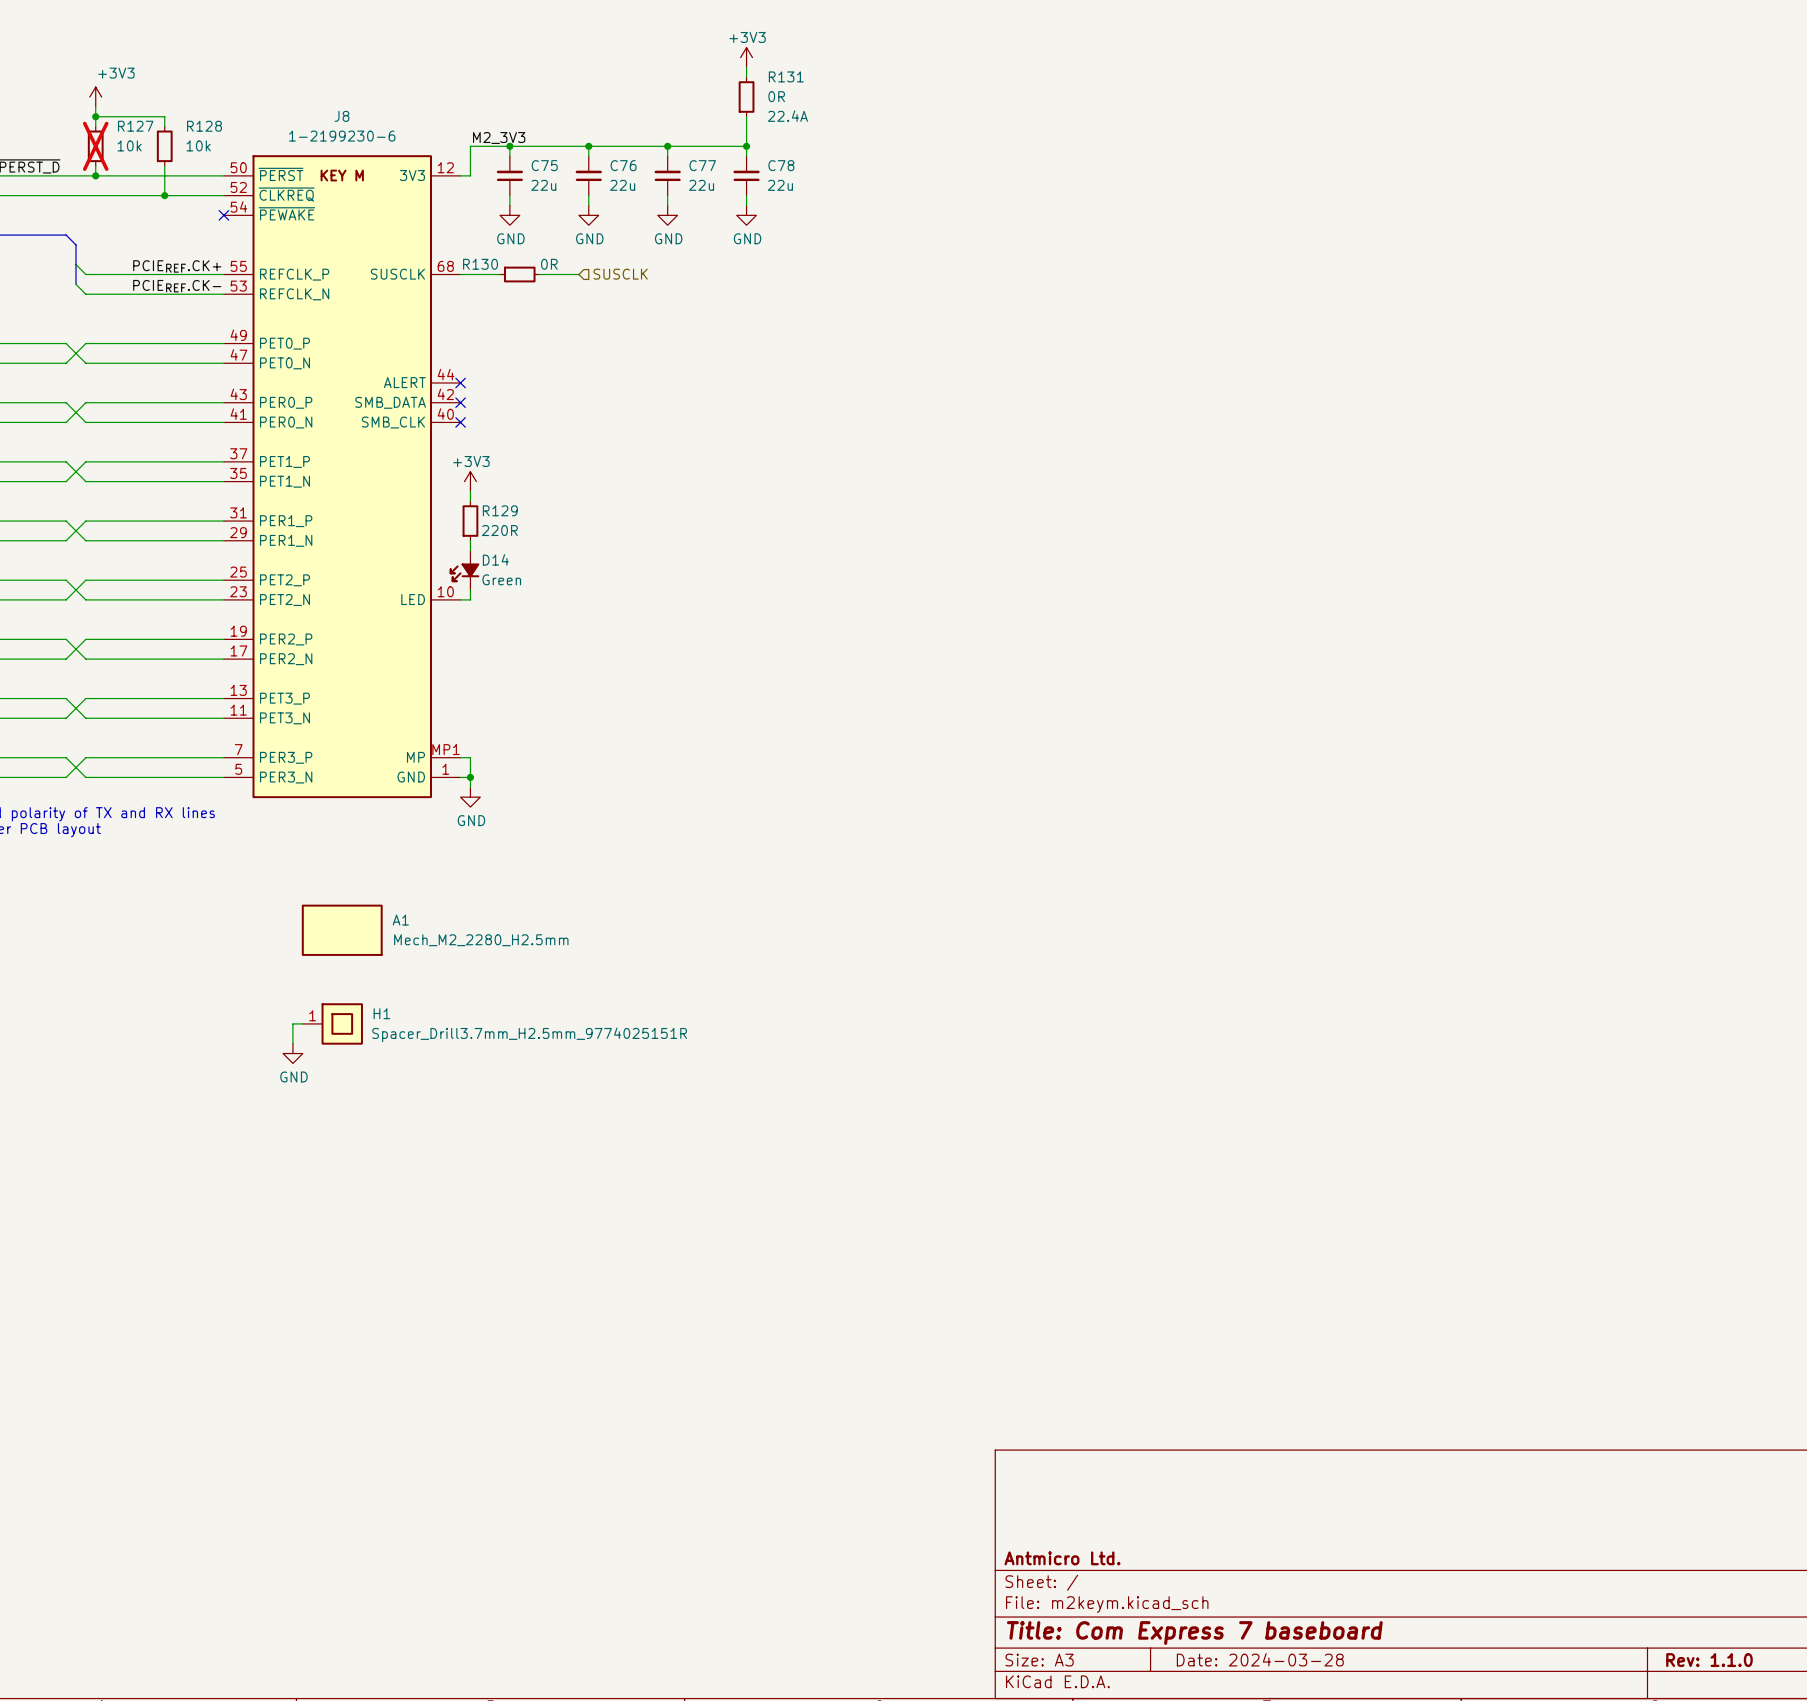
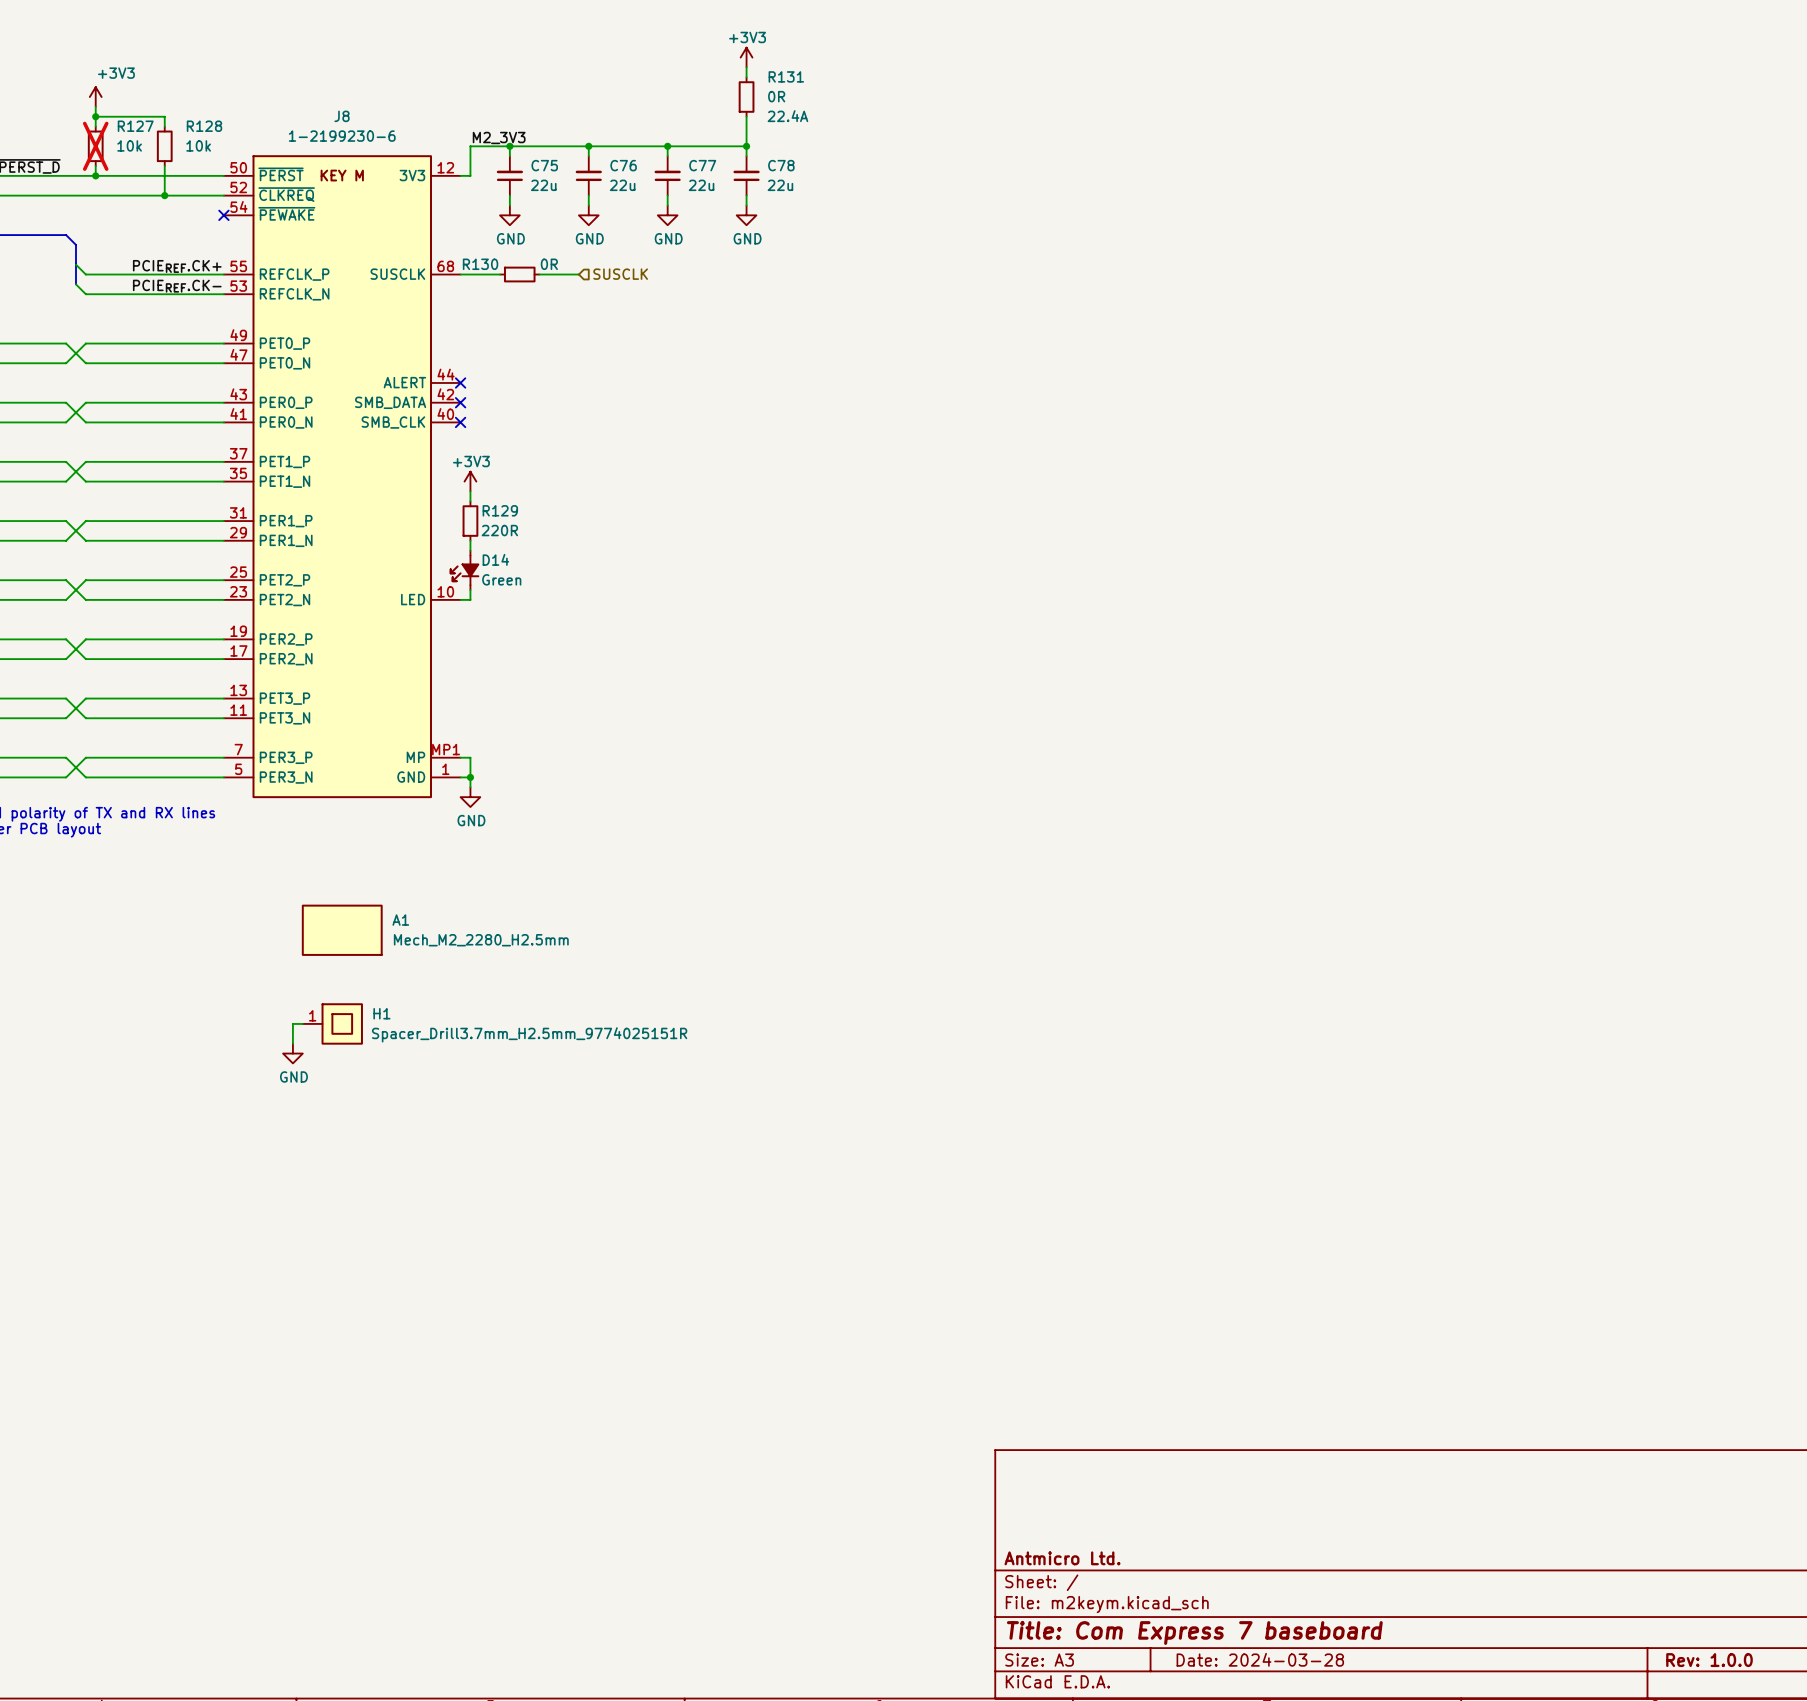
title block: Rev: 1.1.0 (1709, 1660) -> Rev: 1.0.0 (1709, 1660)

